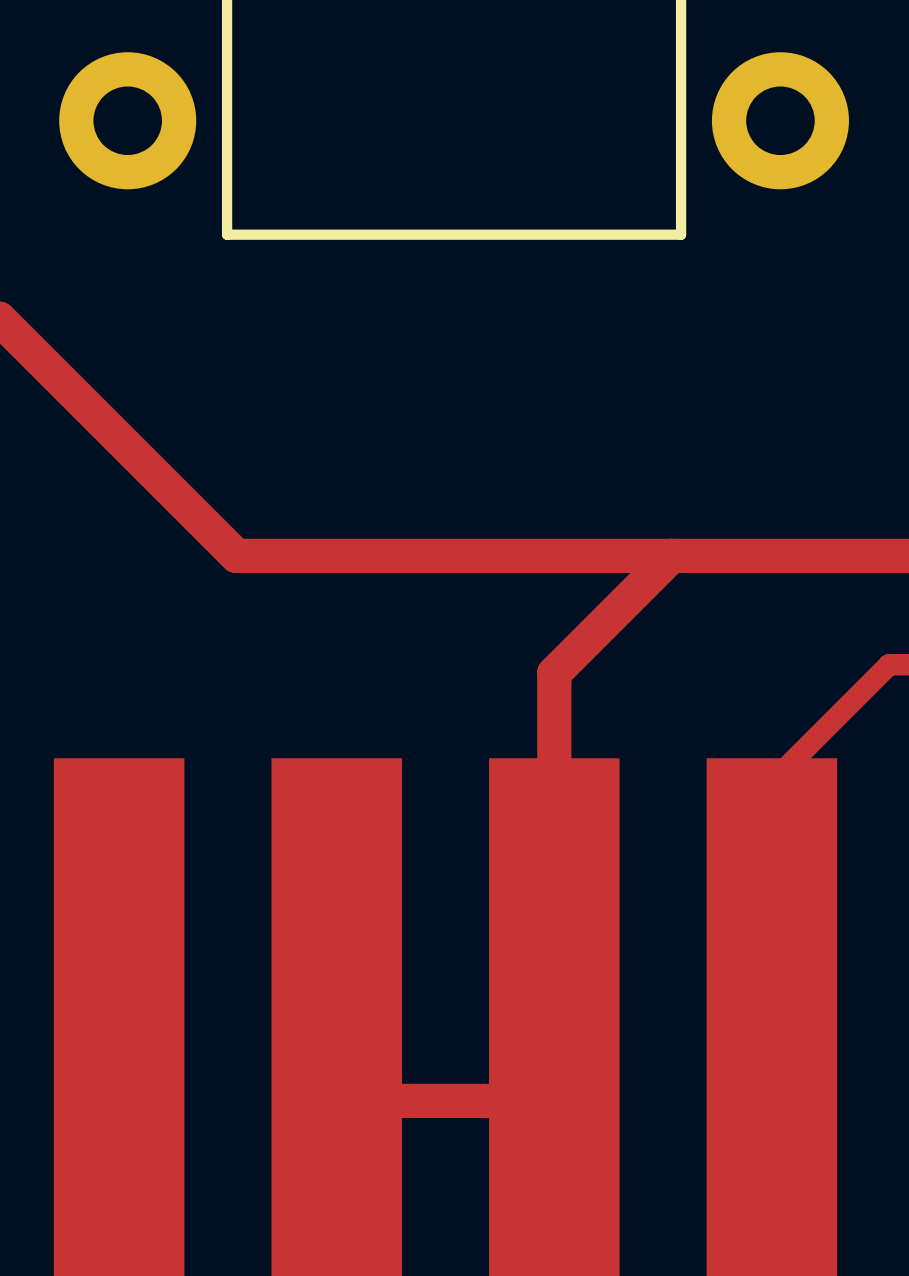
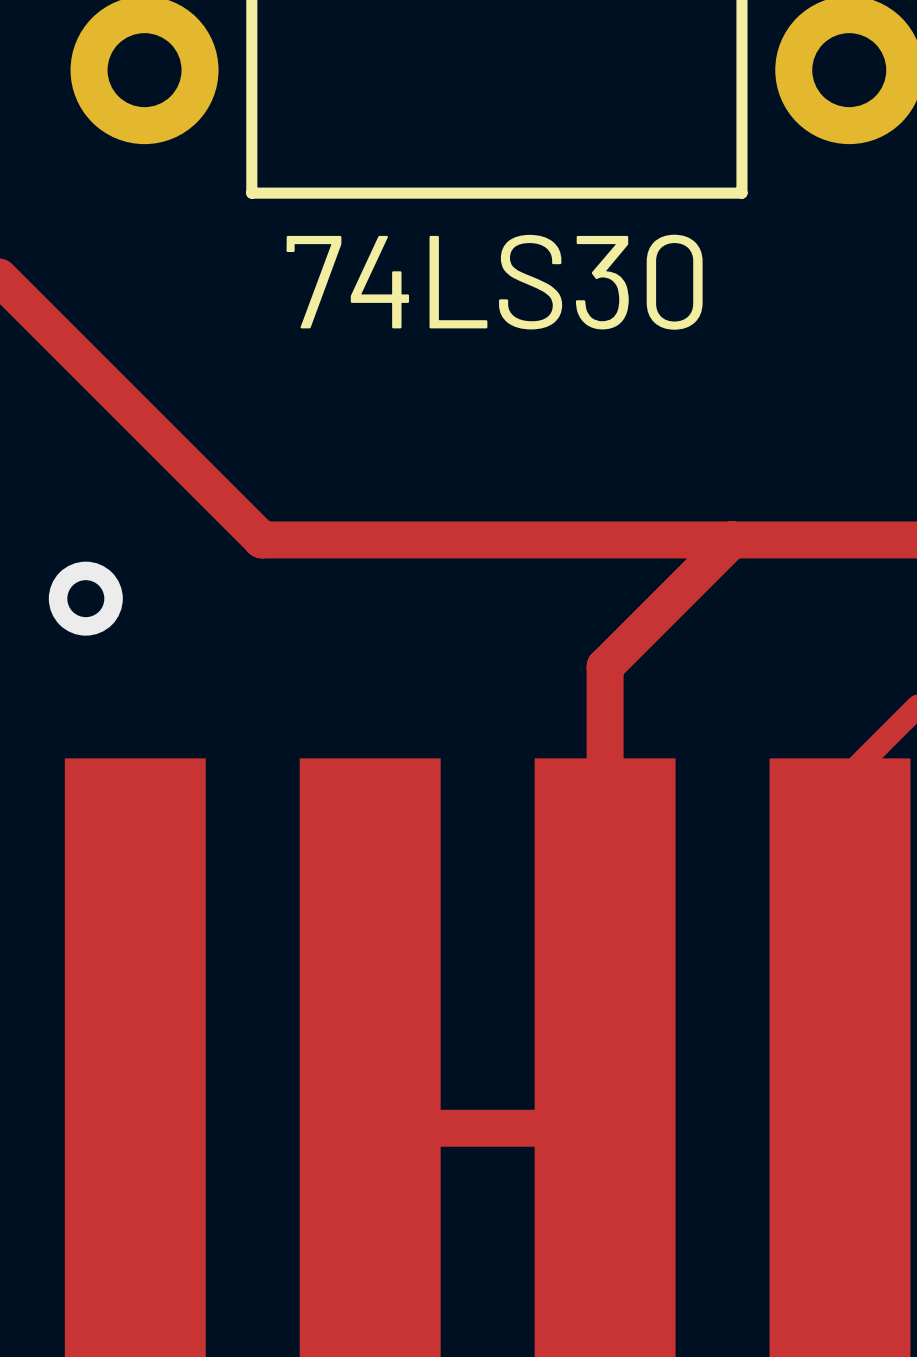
part value: none -> 74LS30 (494, 282)
via: none -> (85, 598)

